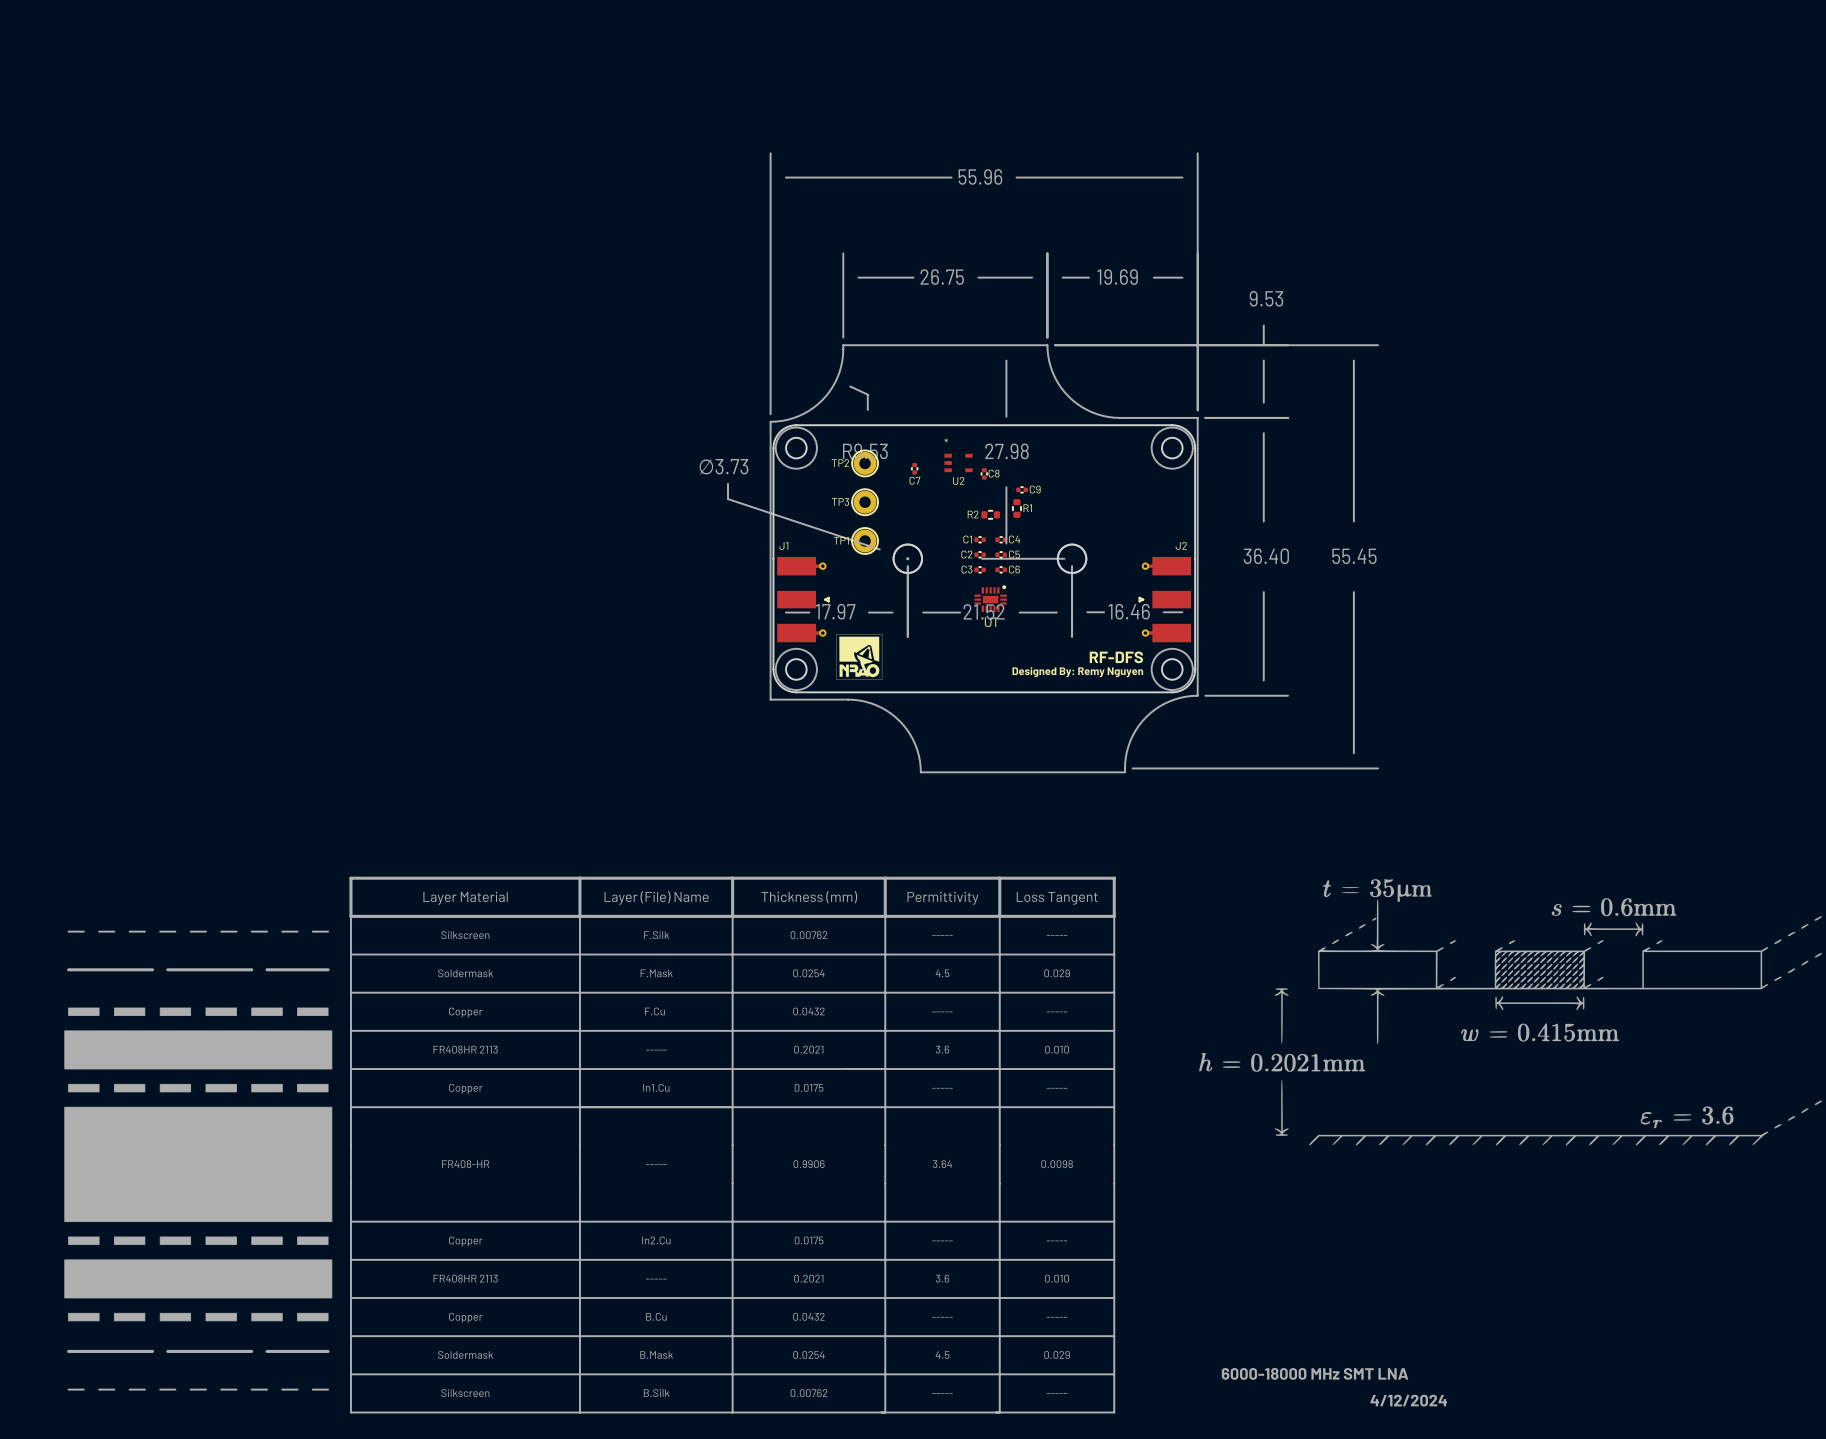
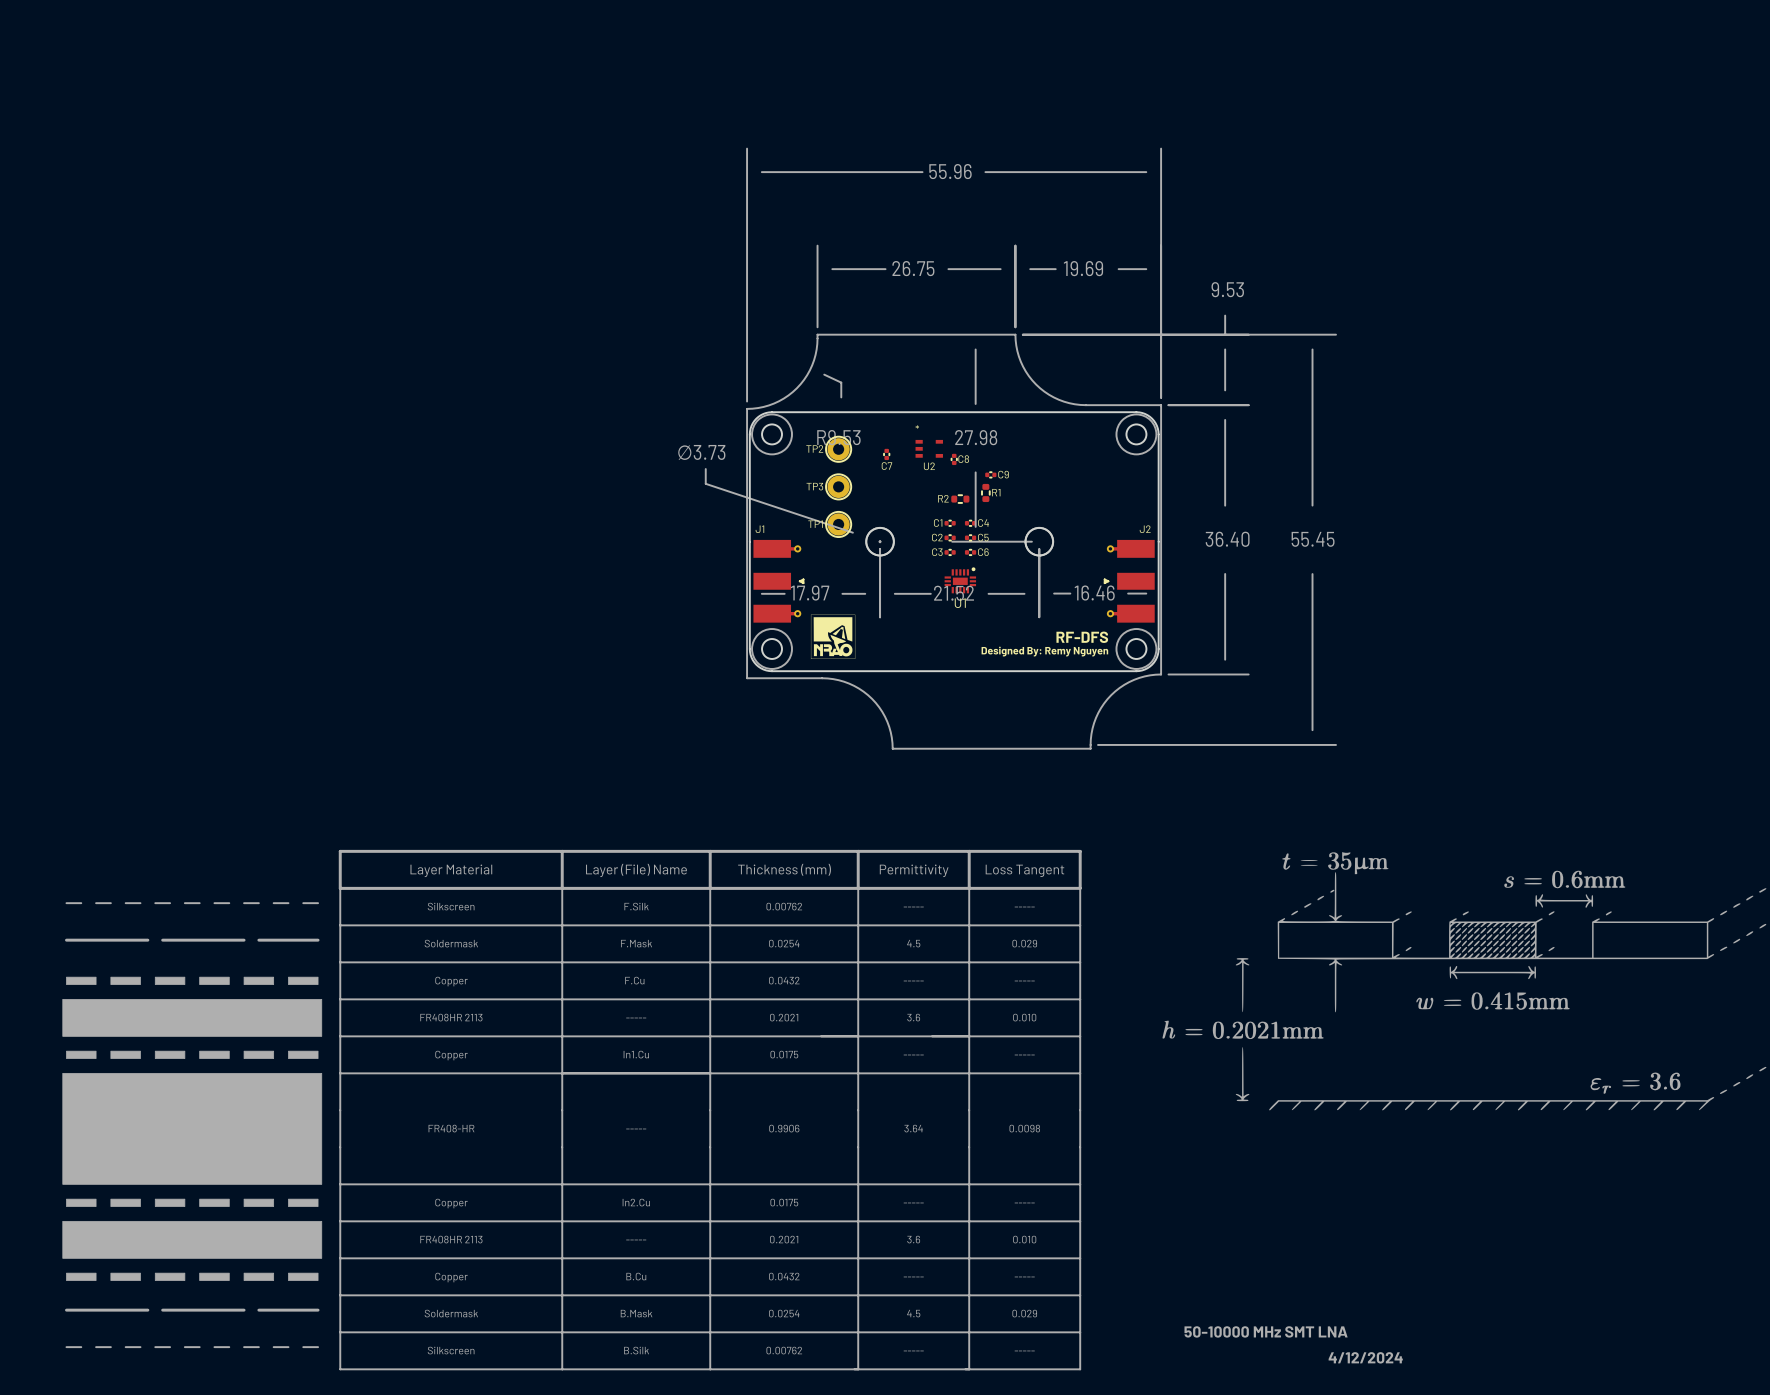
text: 6000-18000 MHz SMT LNA (1315, 1373) -> 50-10000 MHz SMT LNA (1266, 1331)

